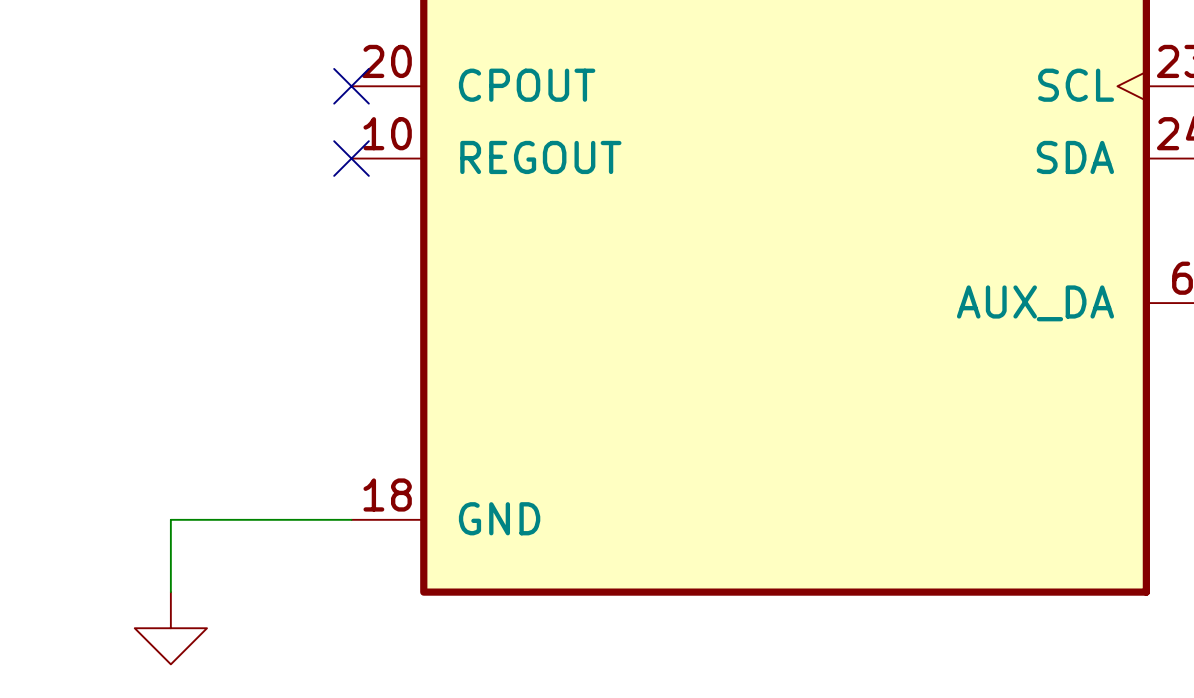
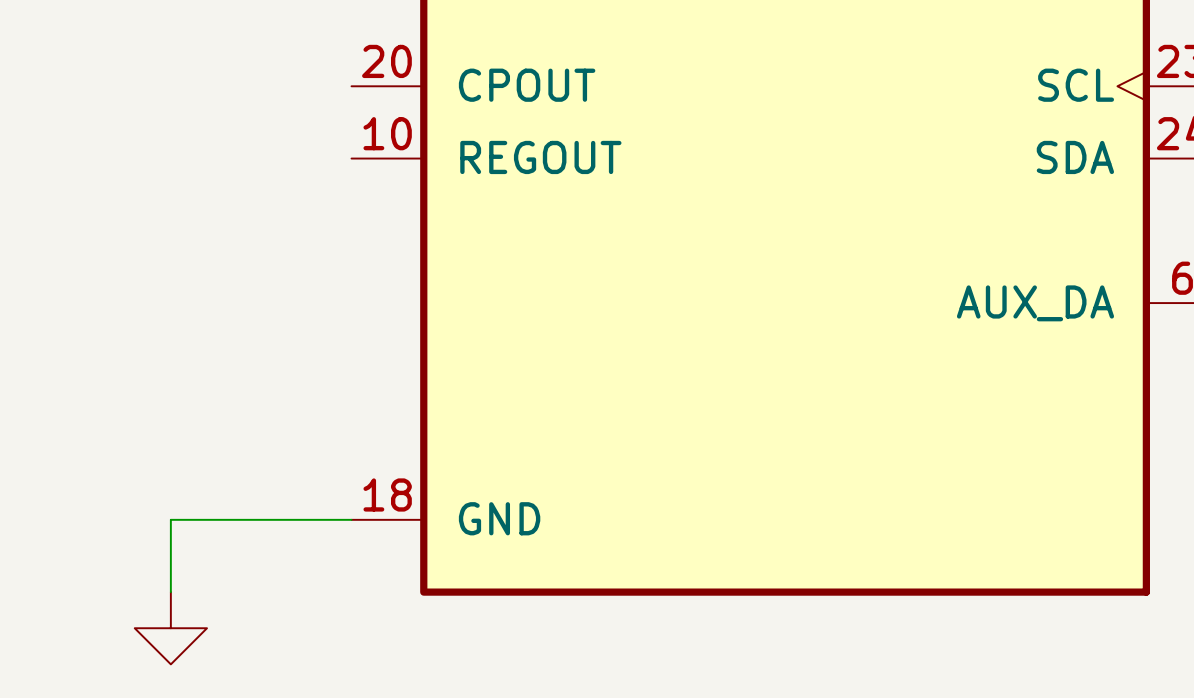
no-connect mark: (351, 86) -> none
no-connect mark: (351, 158) -> none

